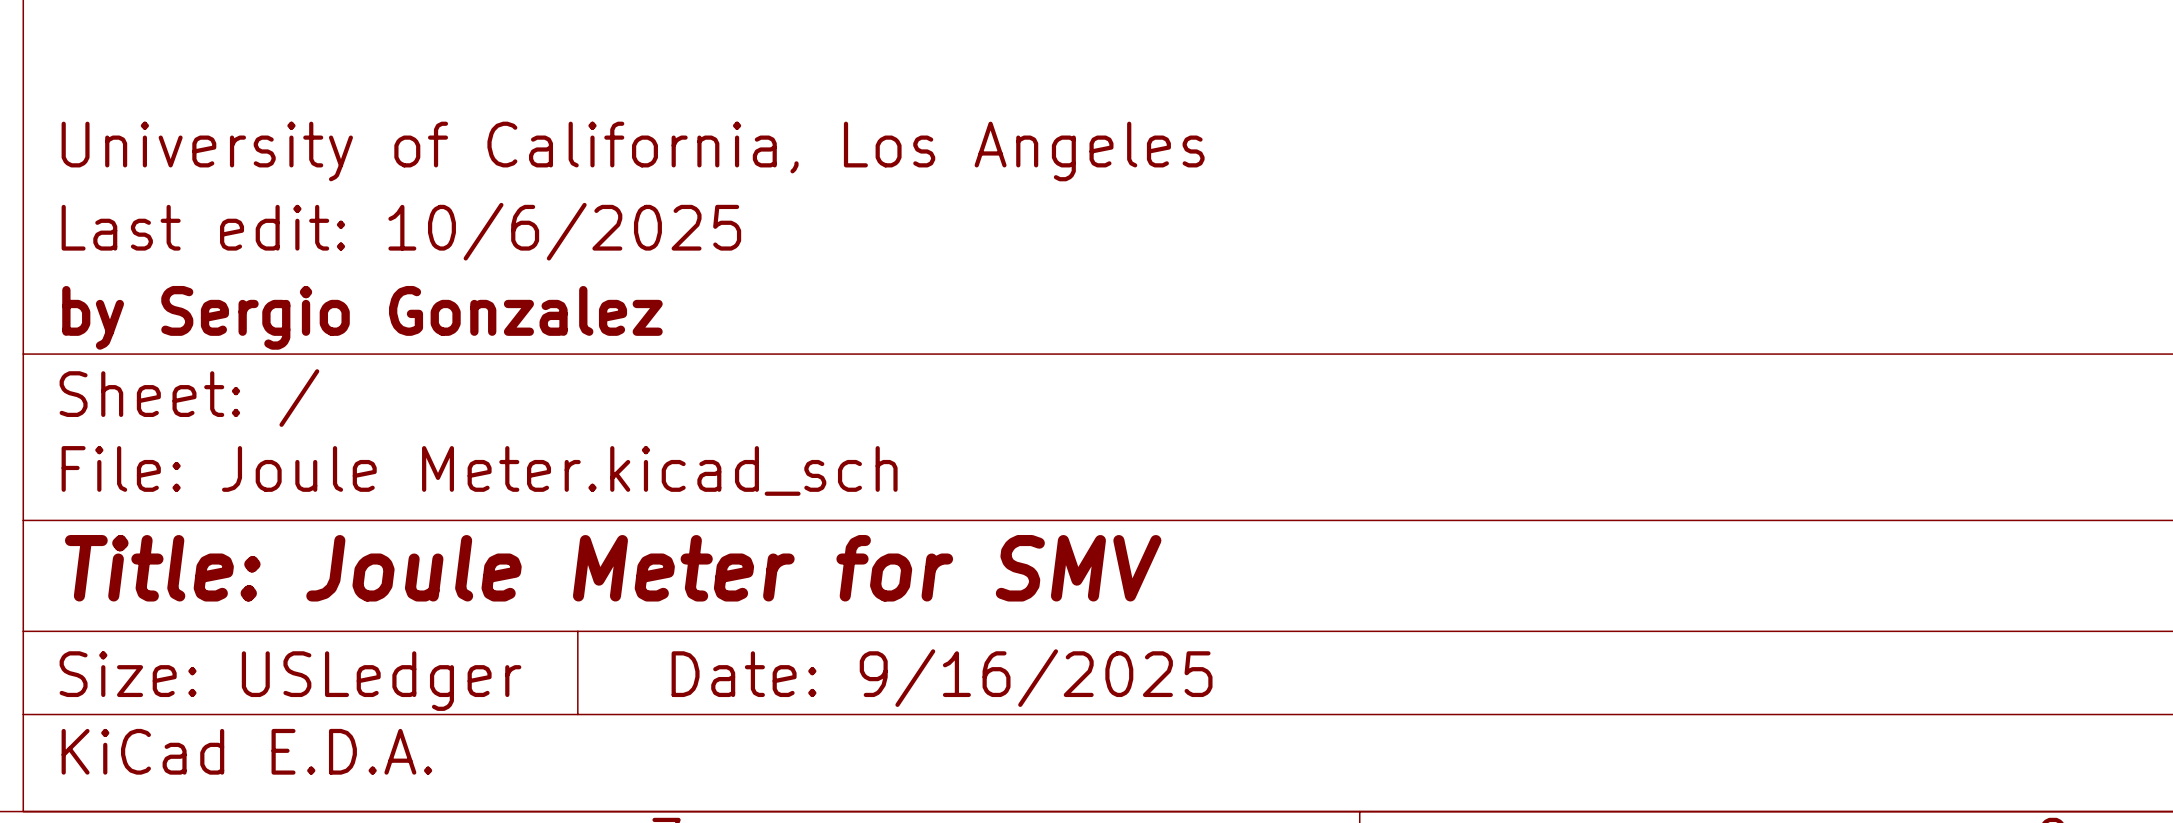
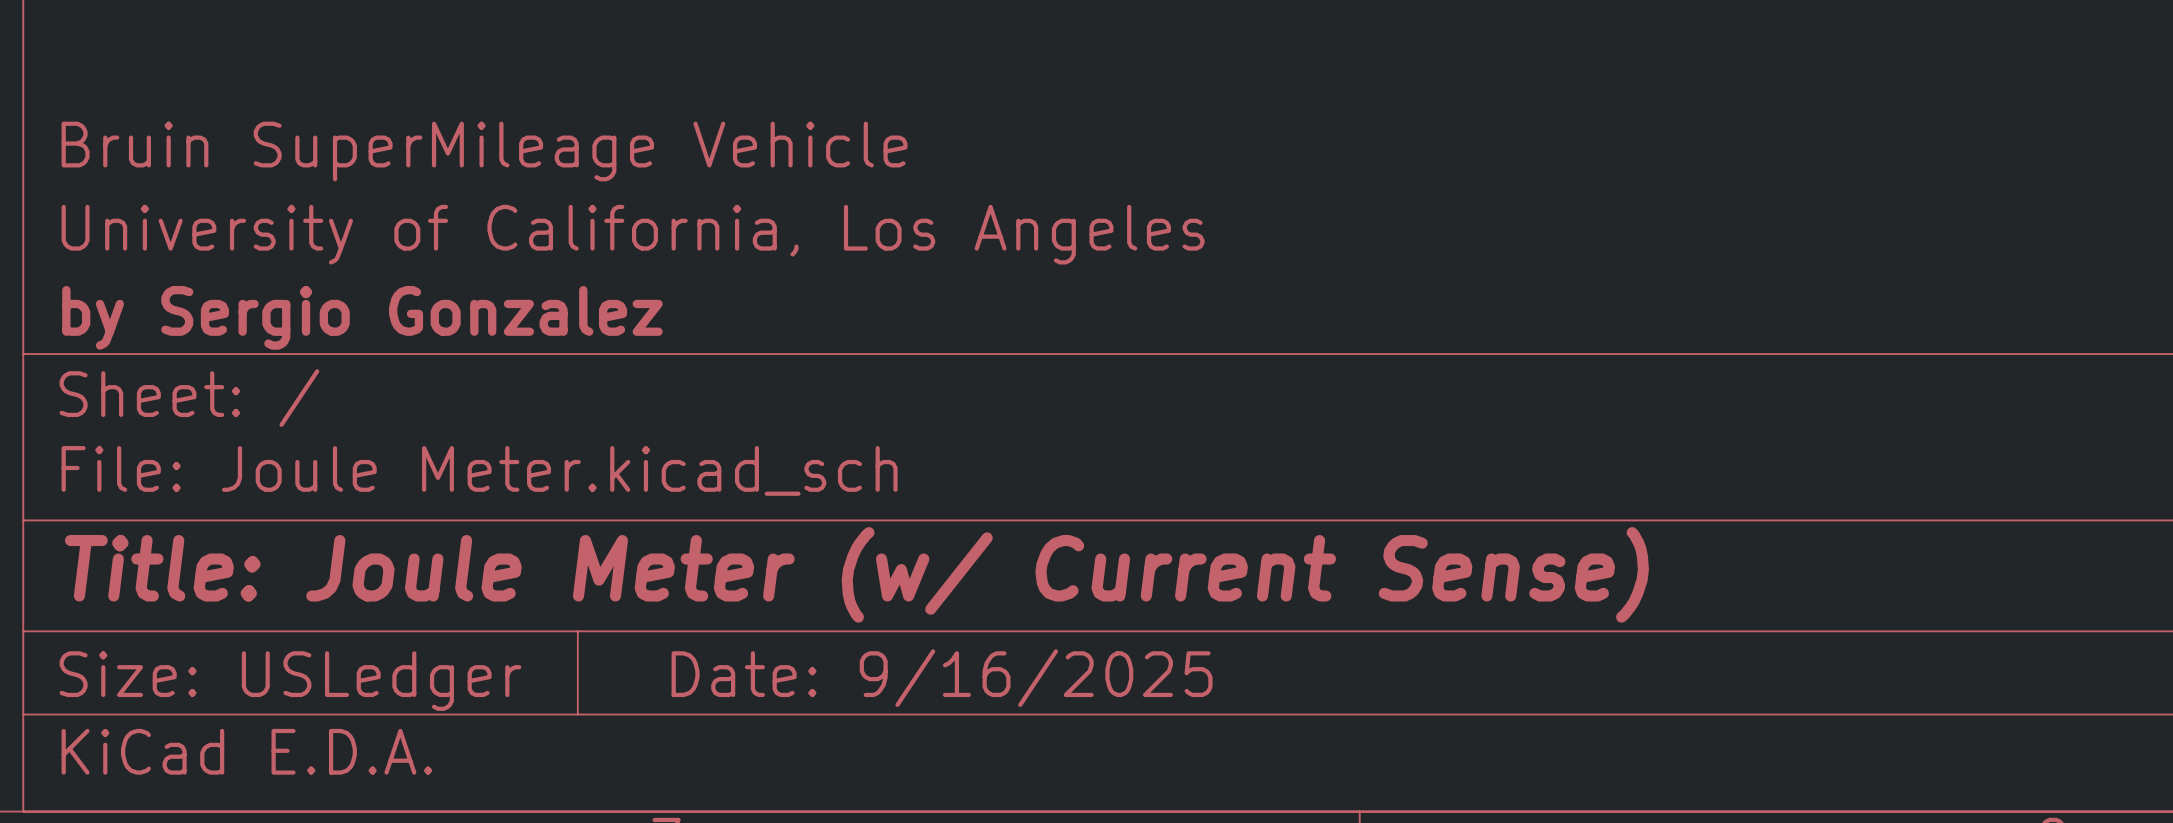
title block: University of California, Los Angeles (633, 151) -> Bruin SuperMileage Vehicle (484, 151)
title block: Last edit: 10/6/2025 (401, 231) -> University of California, Los Angeles (633, 234)
title block: Title: Joule Meter for SMV (613, 568) -> Title: Joule Meter (w/ Current Sense) (856, 574)

